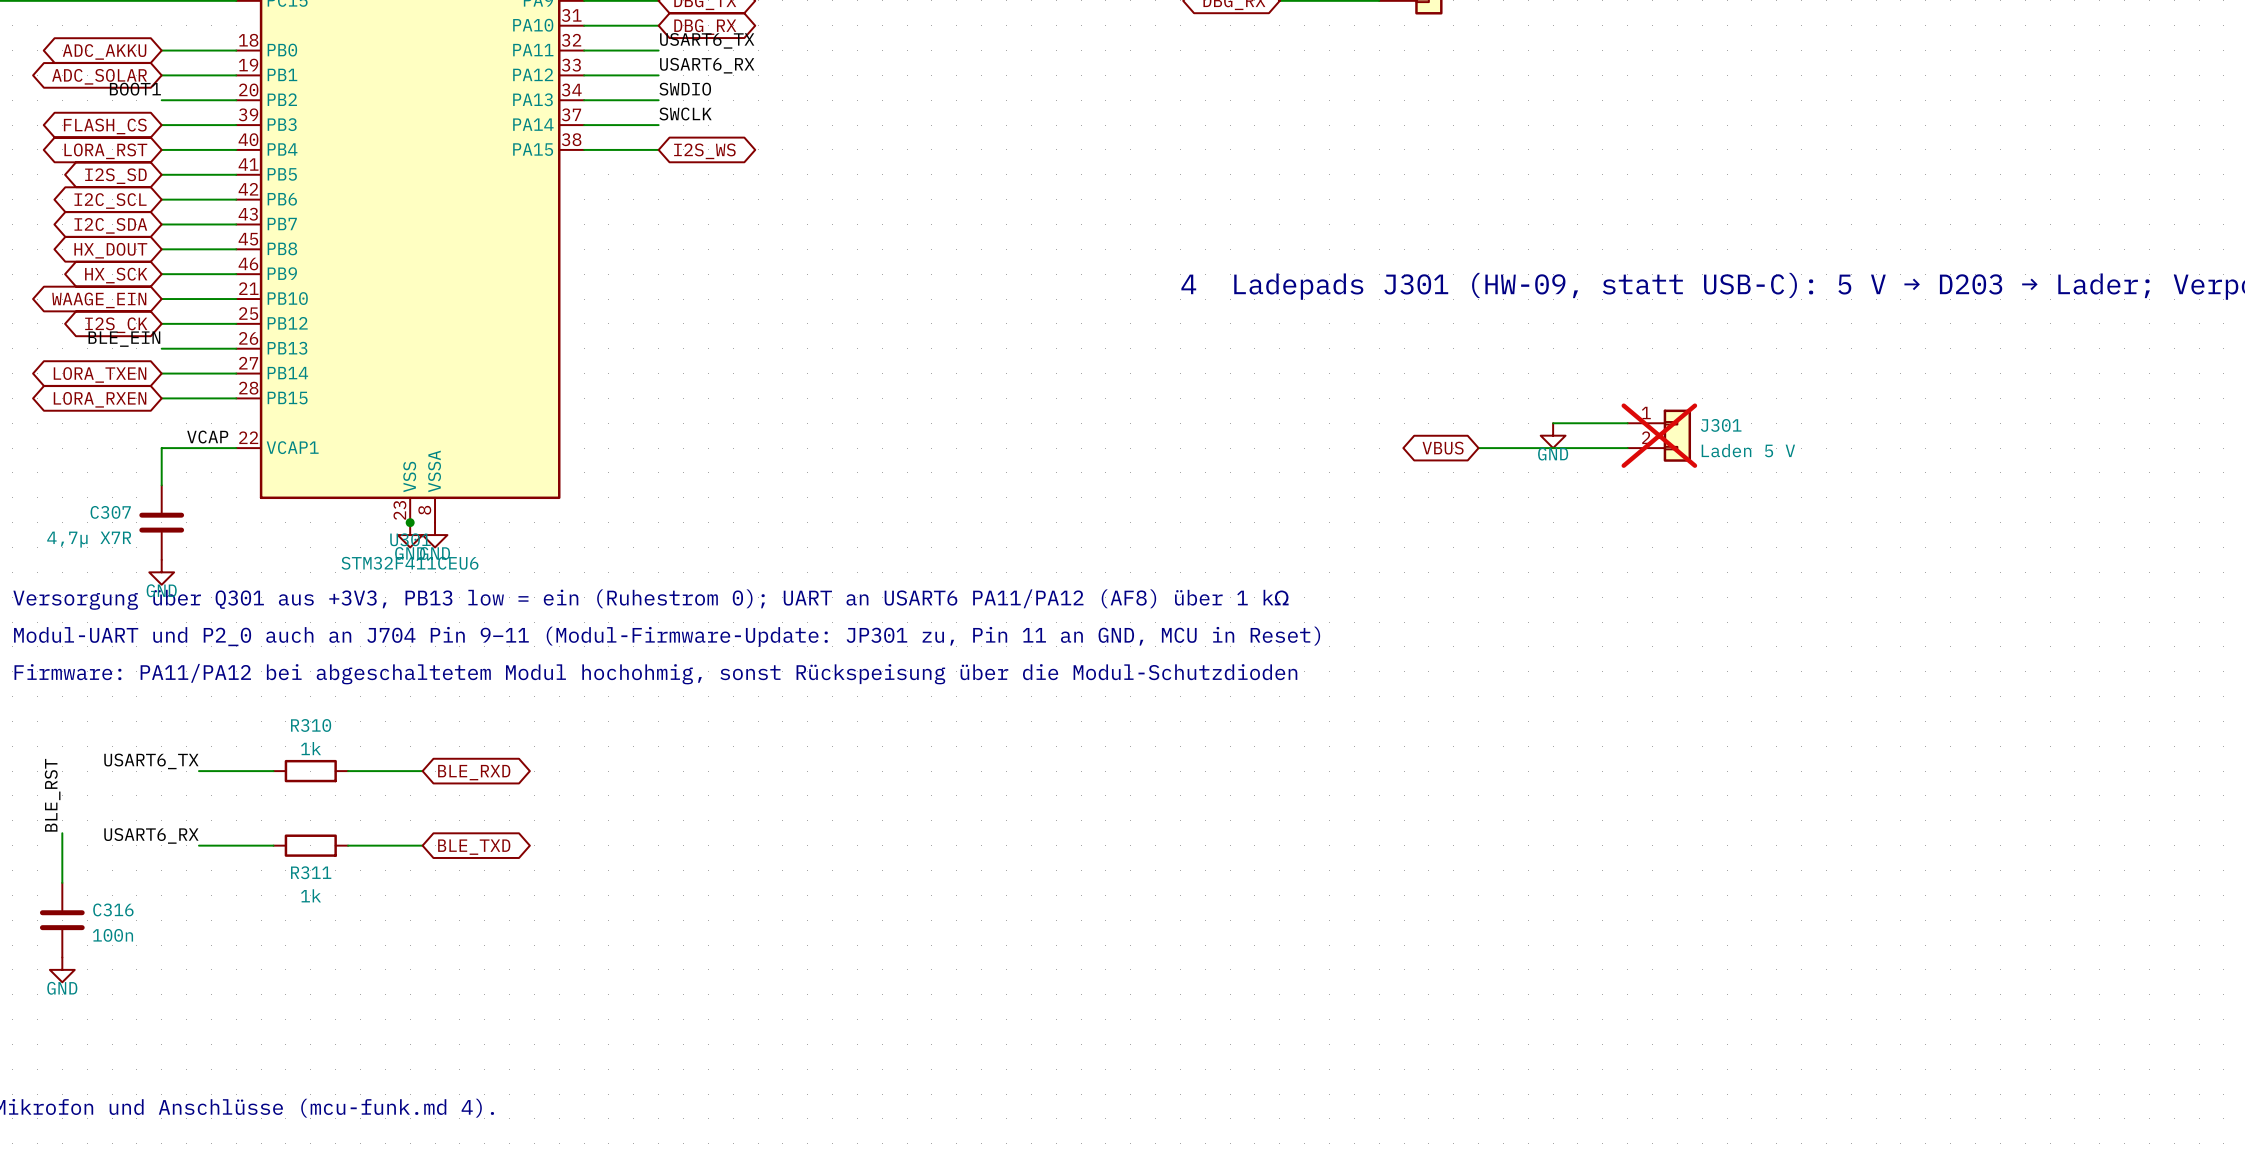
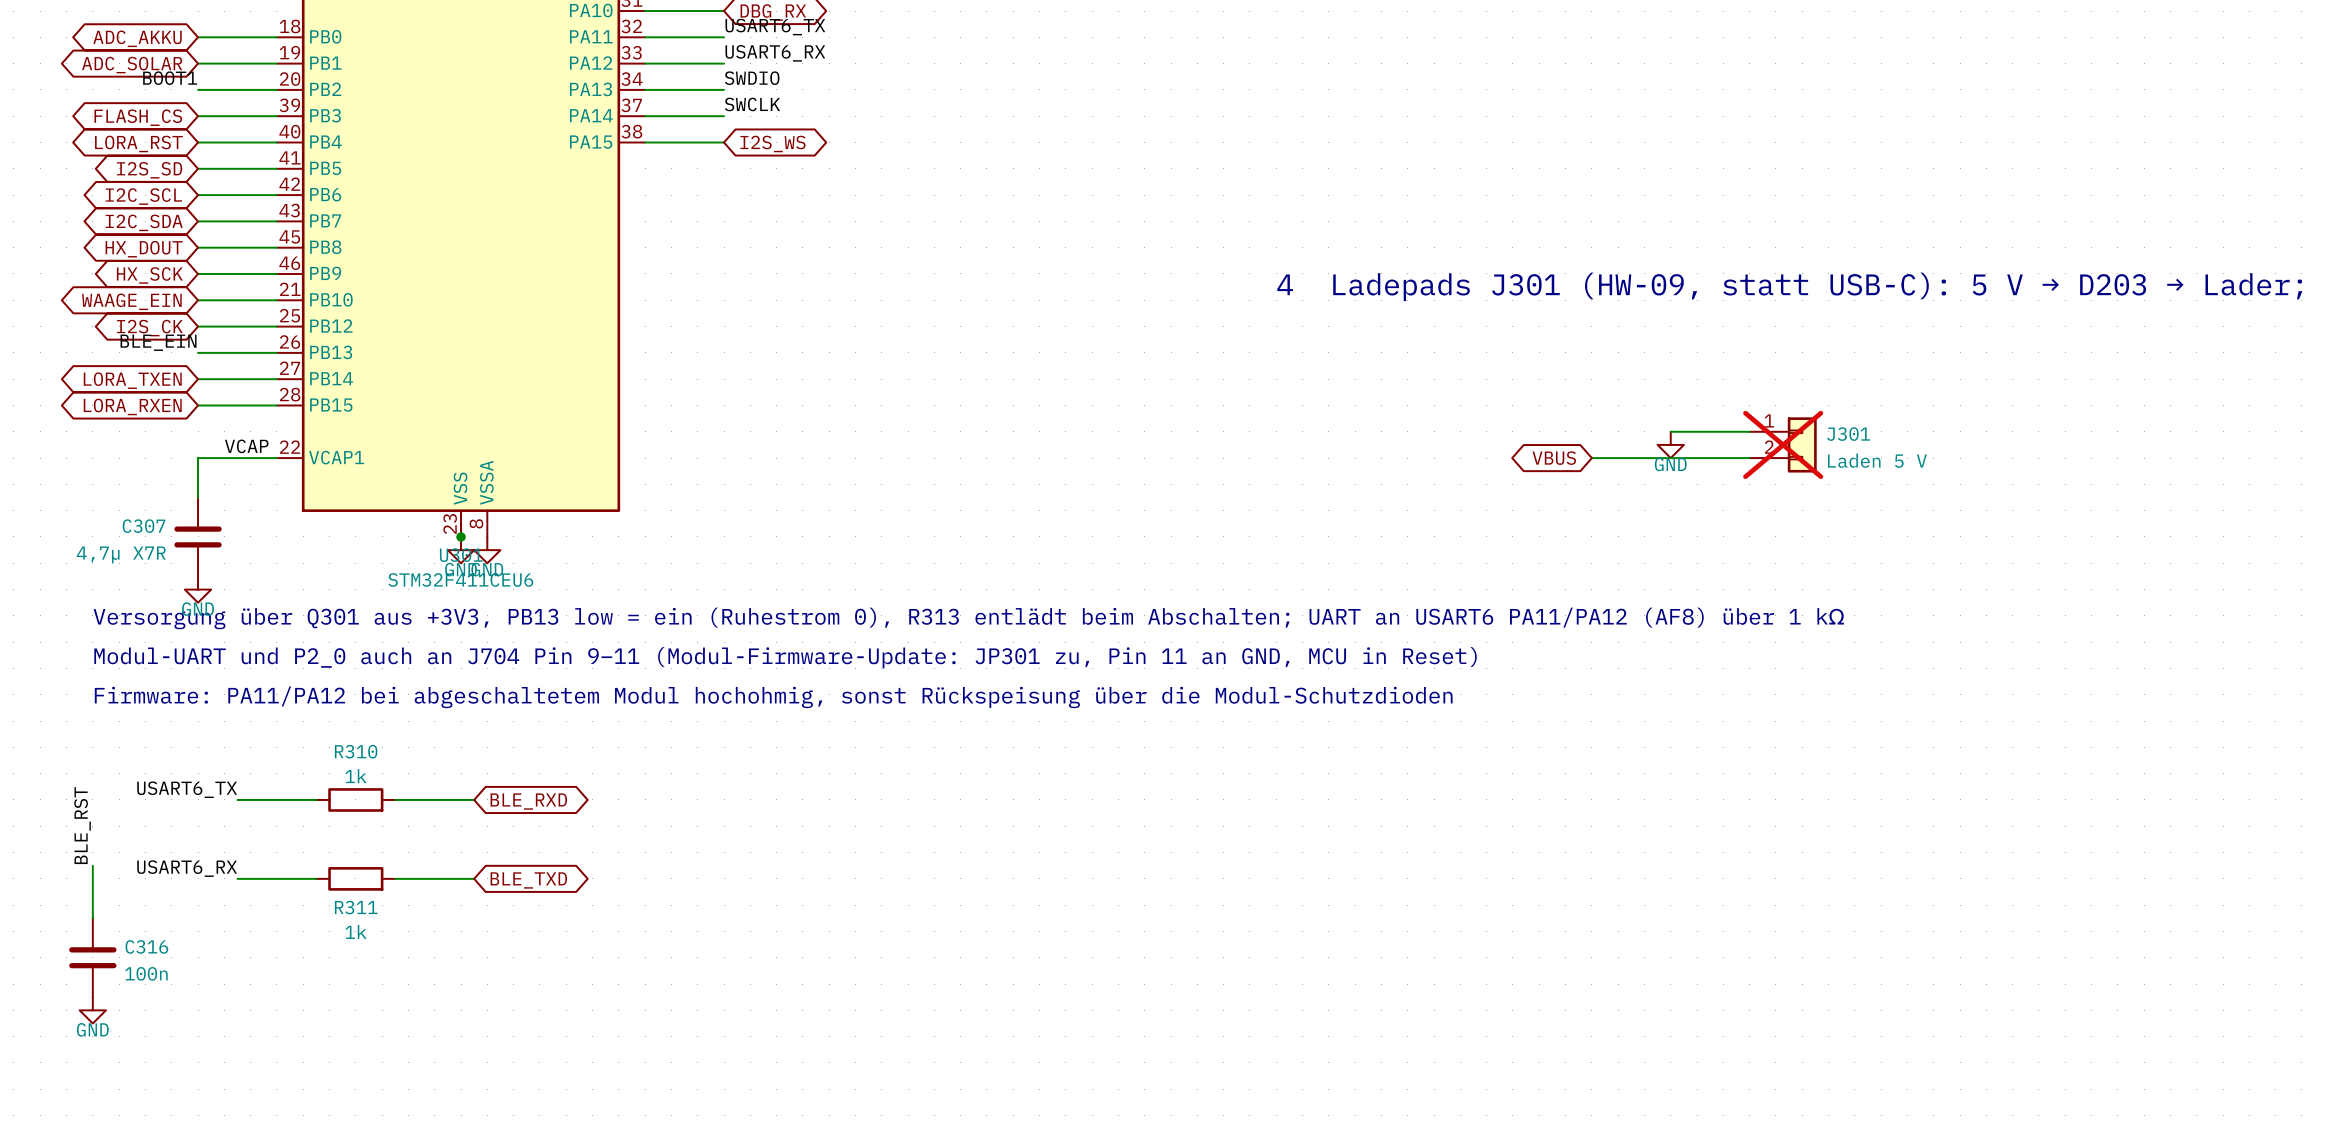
text: Versorgung über Q301 aus +3V3, PB13 low = ein (Ruhestrom 0); UART an USART6 PA11/PA12 (AF8) über 1 kΩ (650, 599) -> Versorgung über Q301 aus +3V3, PB13 low = ein (Ruhestrom 0), R313 entlädt beim Abschalten; UART an USART6 PA11/PA12 (AF8) über 1 kΩ (968, 618)
text position: Modul-UART und P2_0 auch an J704 Pin 9–11 (Modul-Firmware-Update: JP301 zu, Pin 11 an GND, MCU in Reset) (667, 636) -> Modul-UART und P2_0 auch an J704 Pin 9–11 (Modul-Firmware-Update: JP301 zu, Pin 11 an GND, MCU in Reset) (785, 657)
text position: Firmware: PA11/PA12 bei abgeschaltetem Modul hochohmig, sonst Rückspeisung über die Modul-Schutzdioden (655, 674) -> Firmware: PA11/PA12 bei abgeschaltetem Modul hochohmig, sonst Rückspeisung über die Modul-Schutzdioden (773, 697)

